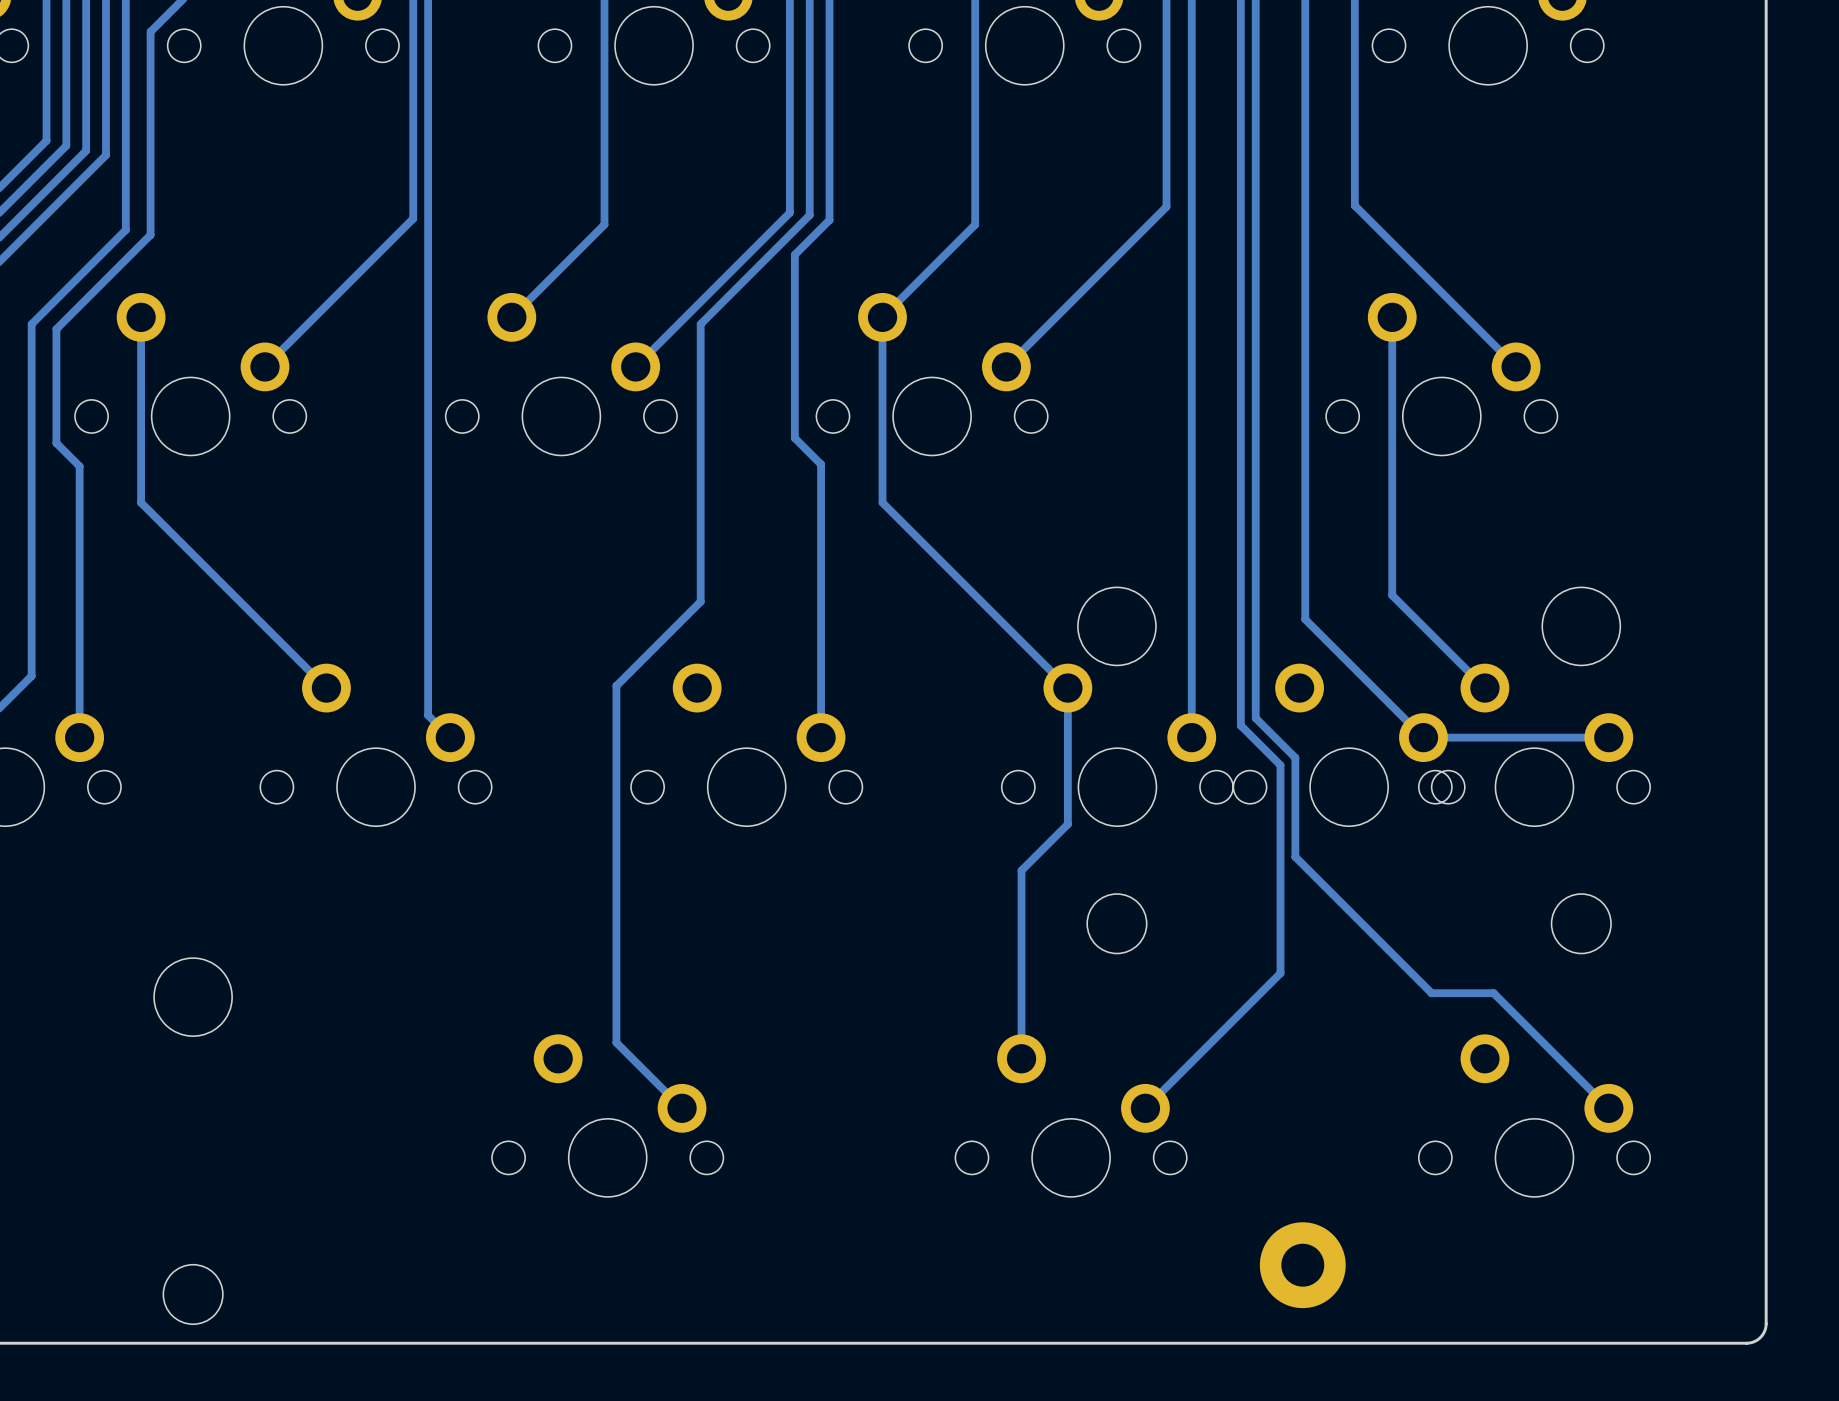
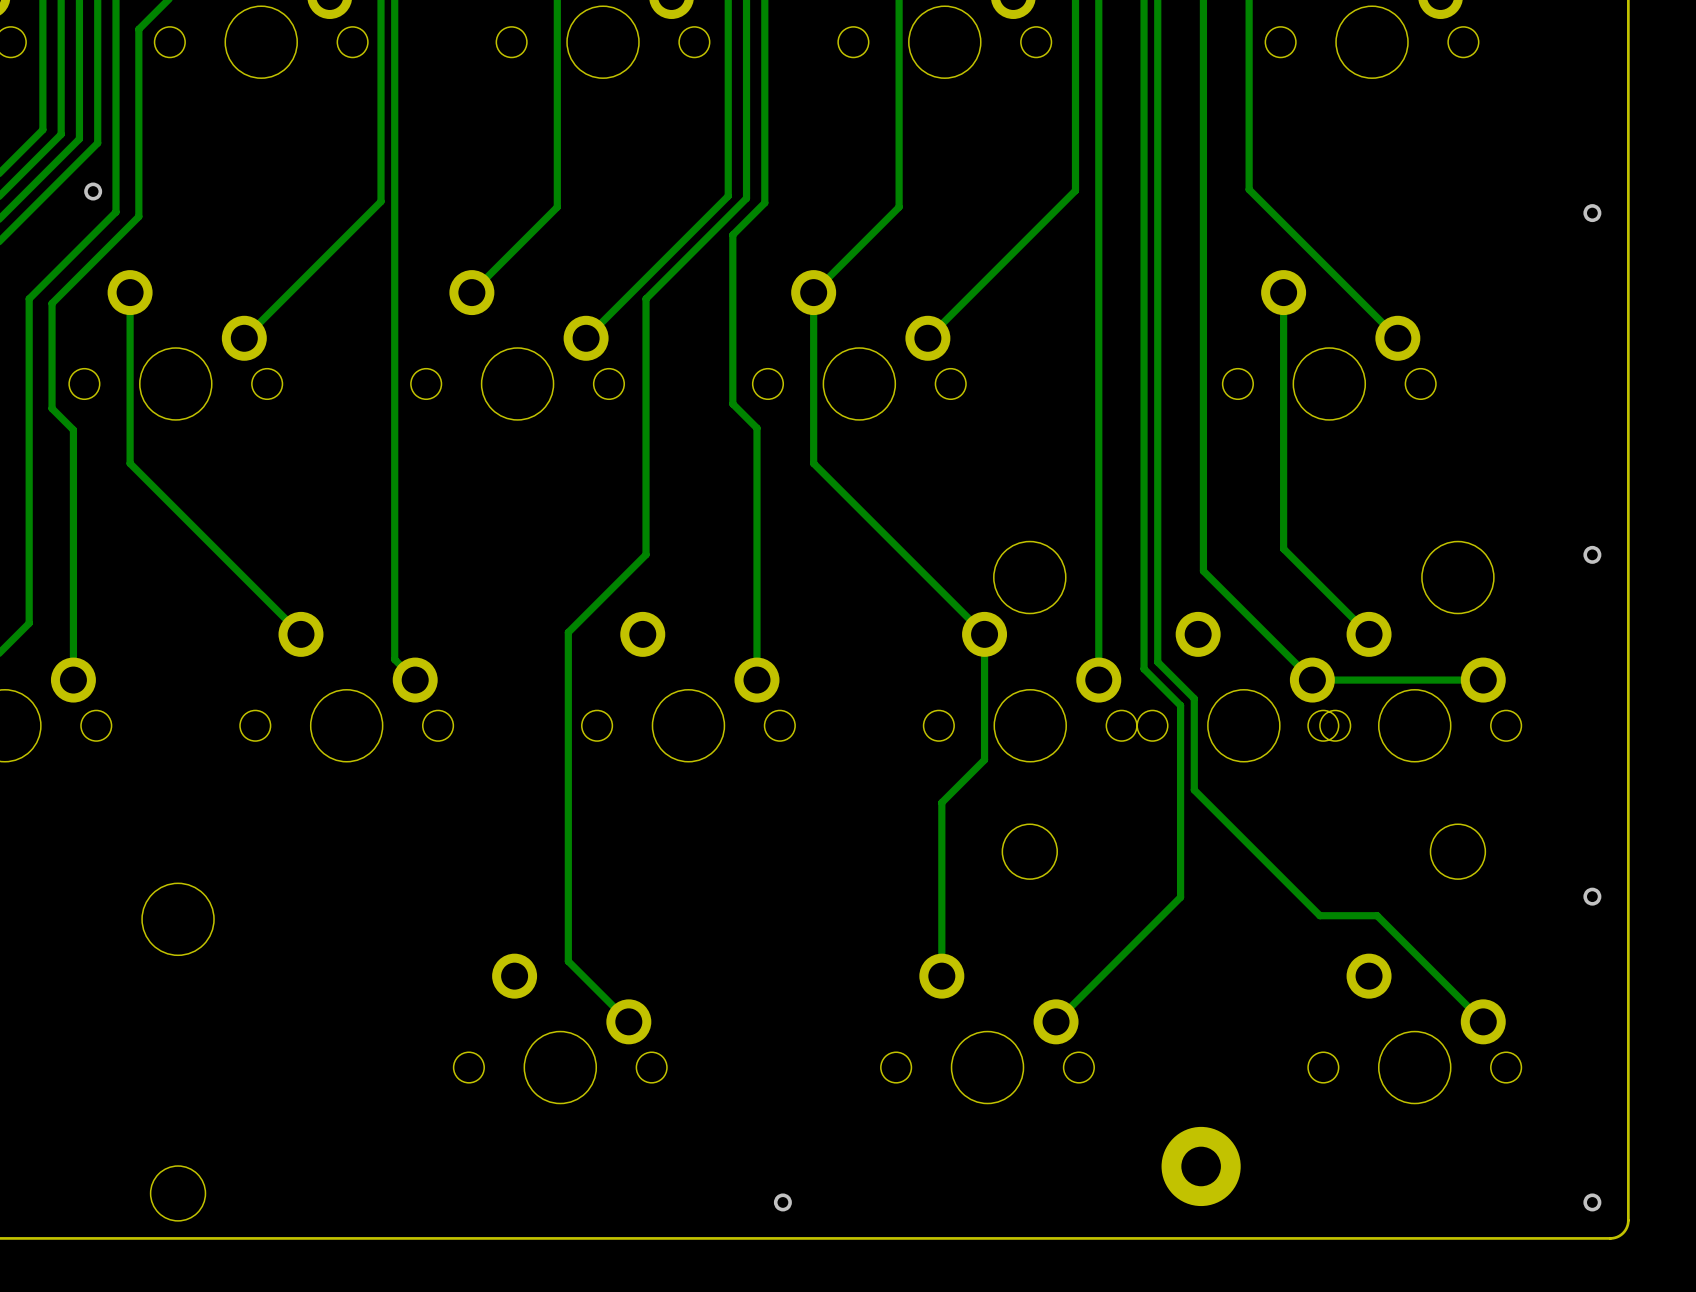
via: none -> (93, 191)
via: none -> (1592, 213)
via: none -> (1592, 554)
via: none -> (1592, 896)
via: none -> (782, 1202)
via: none -> (1592, 1202)

